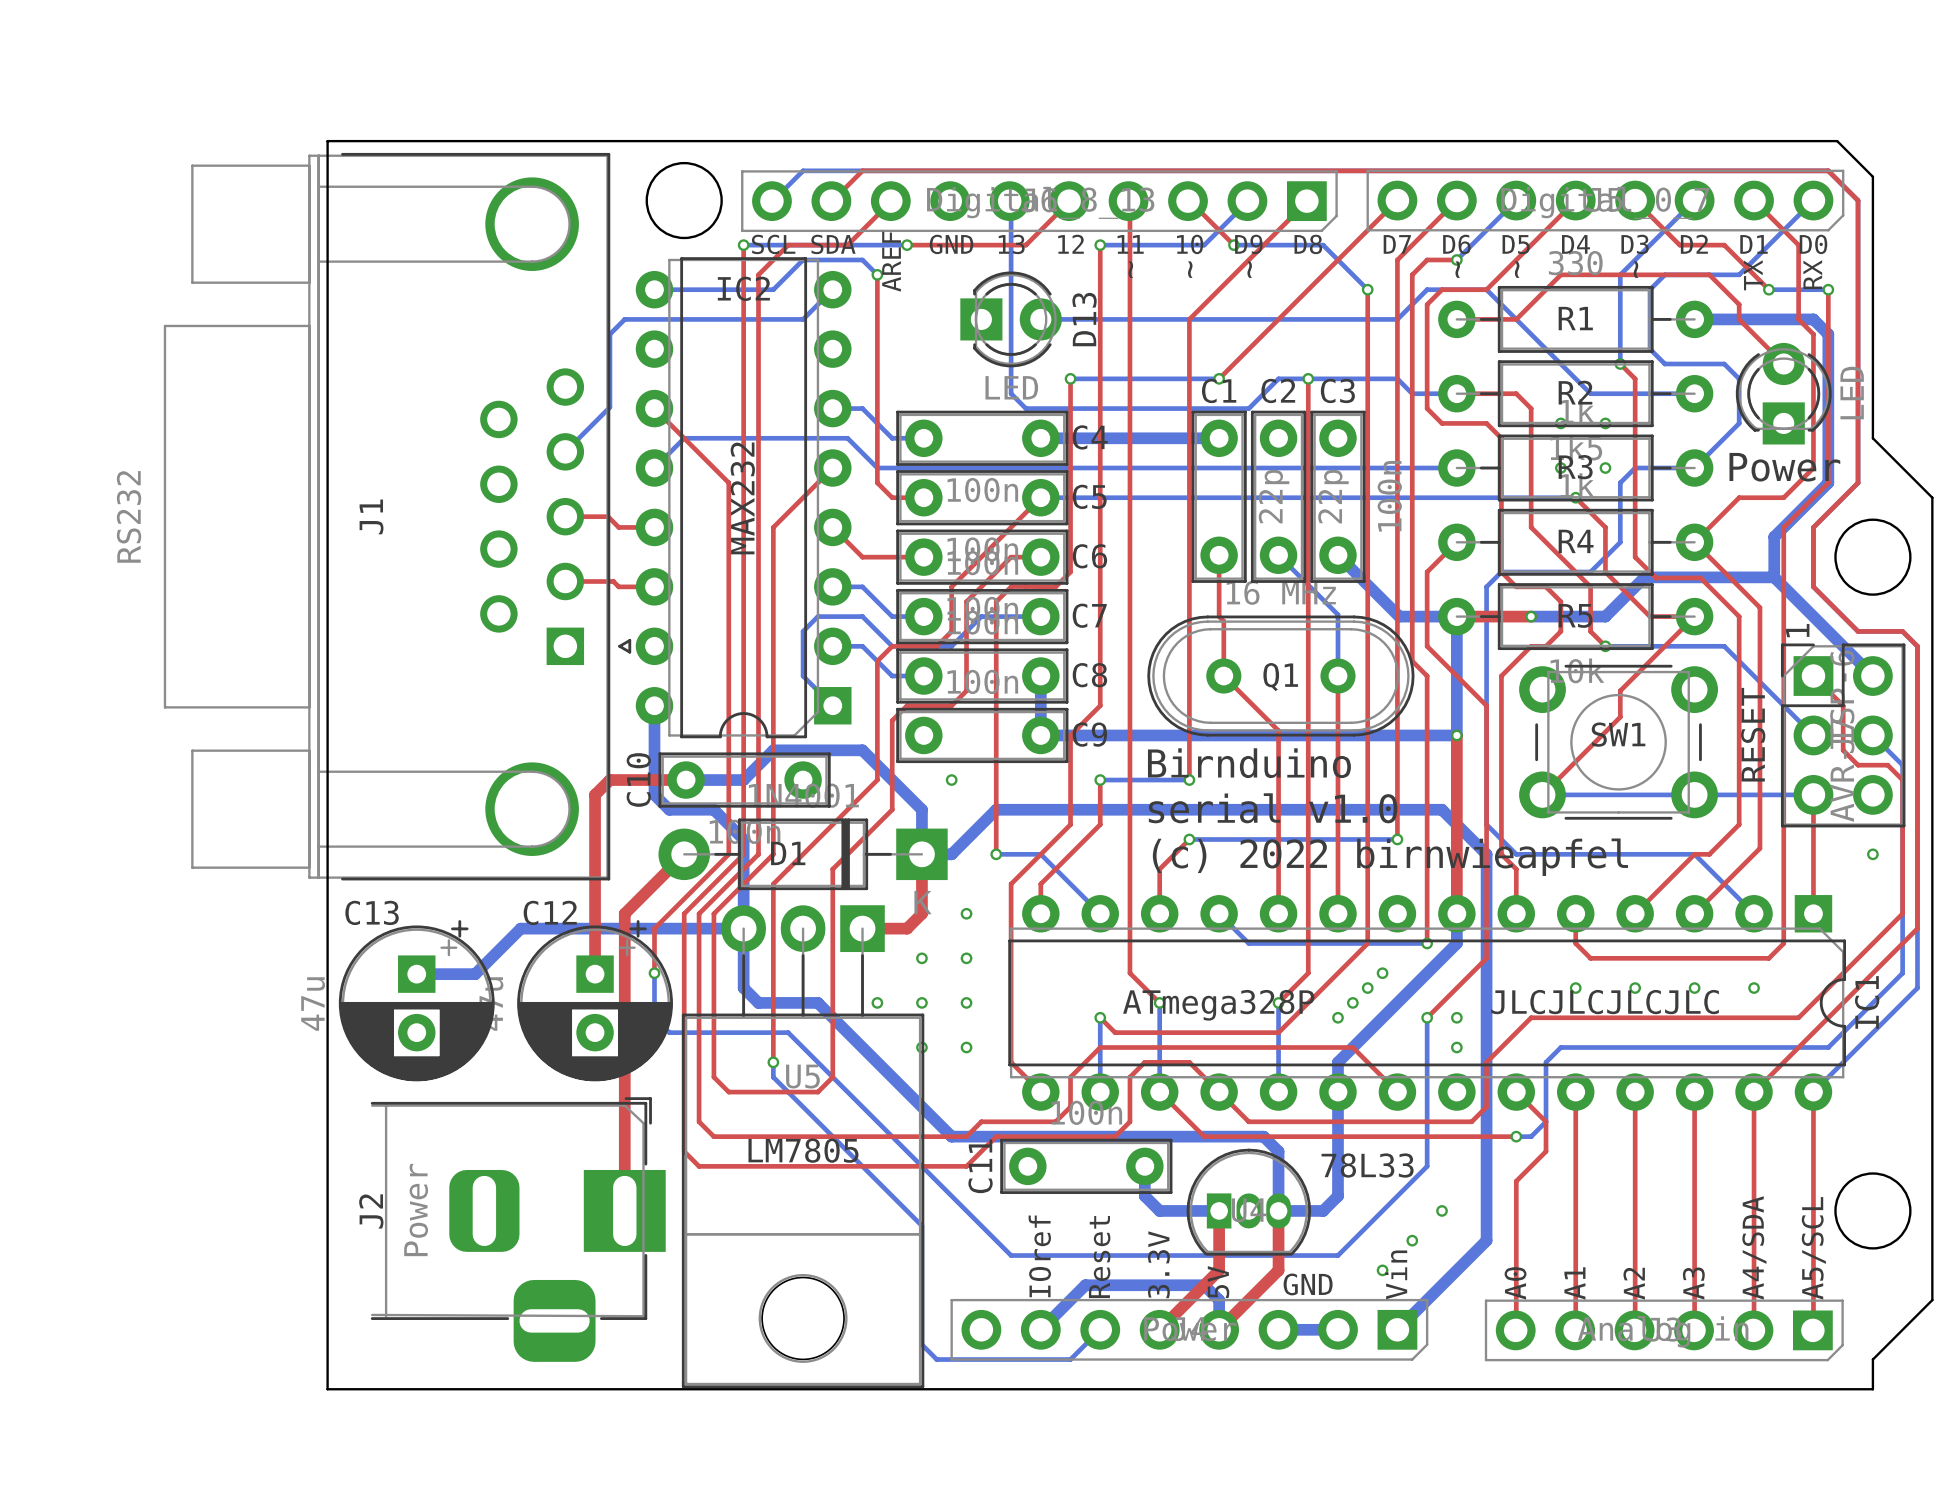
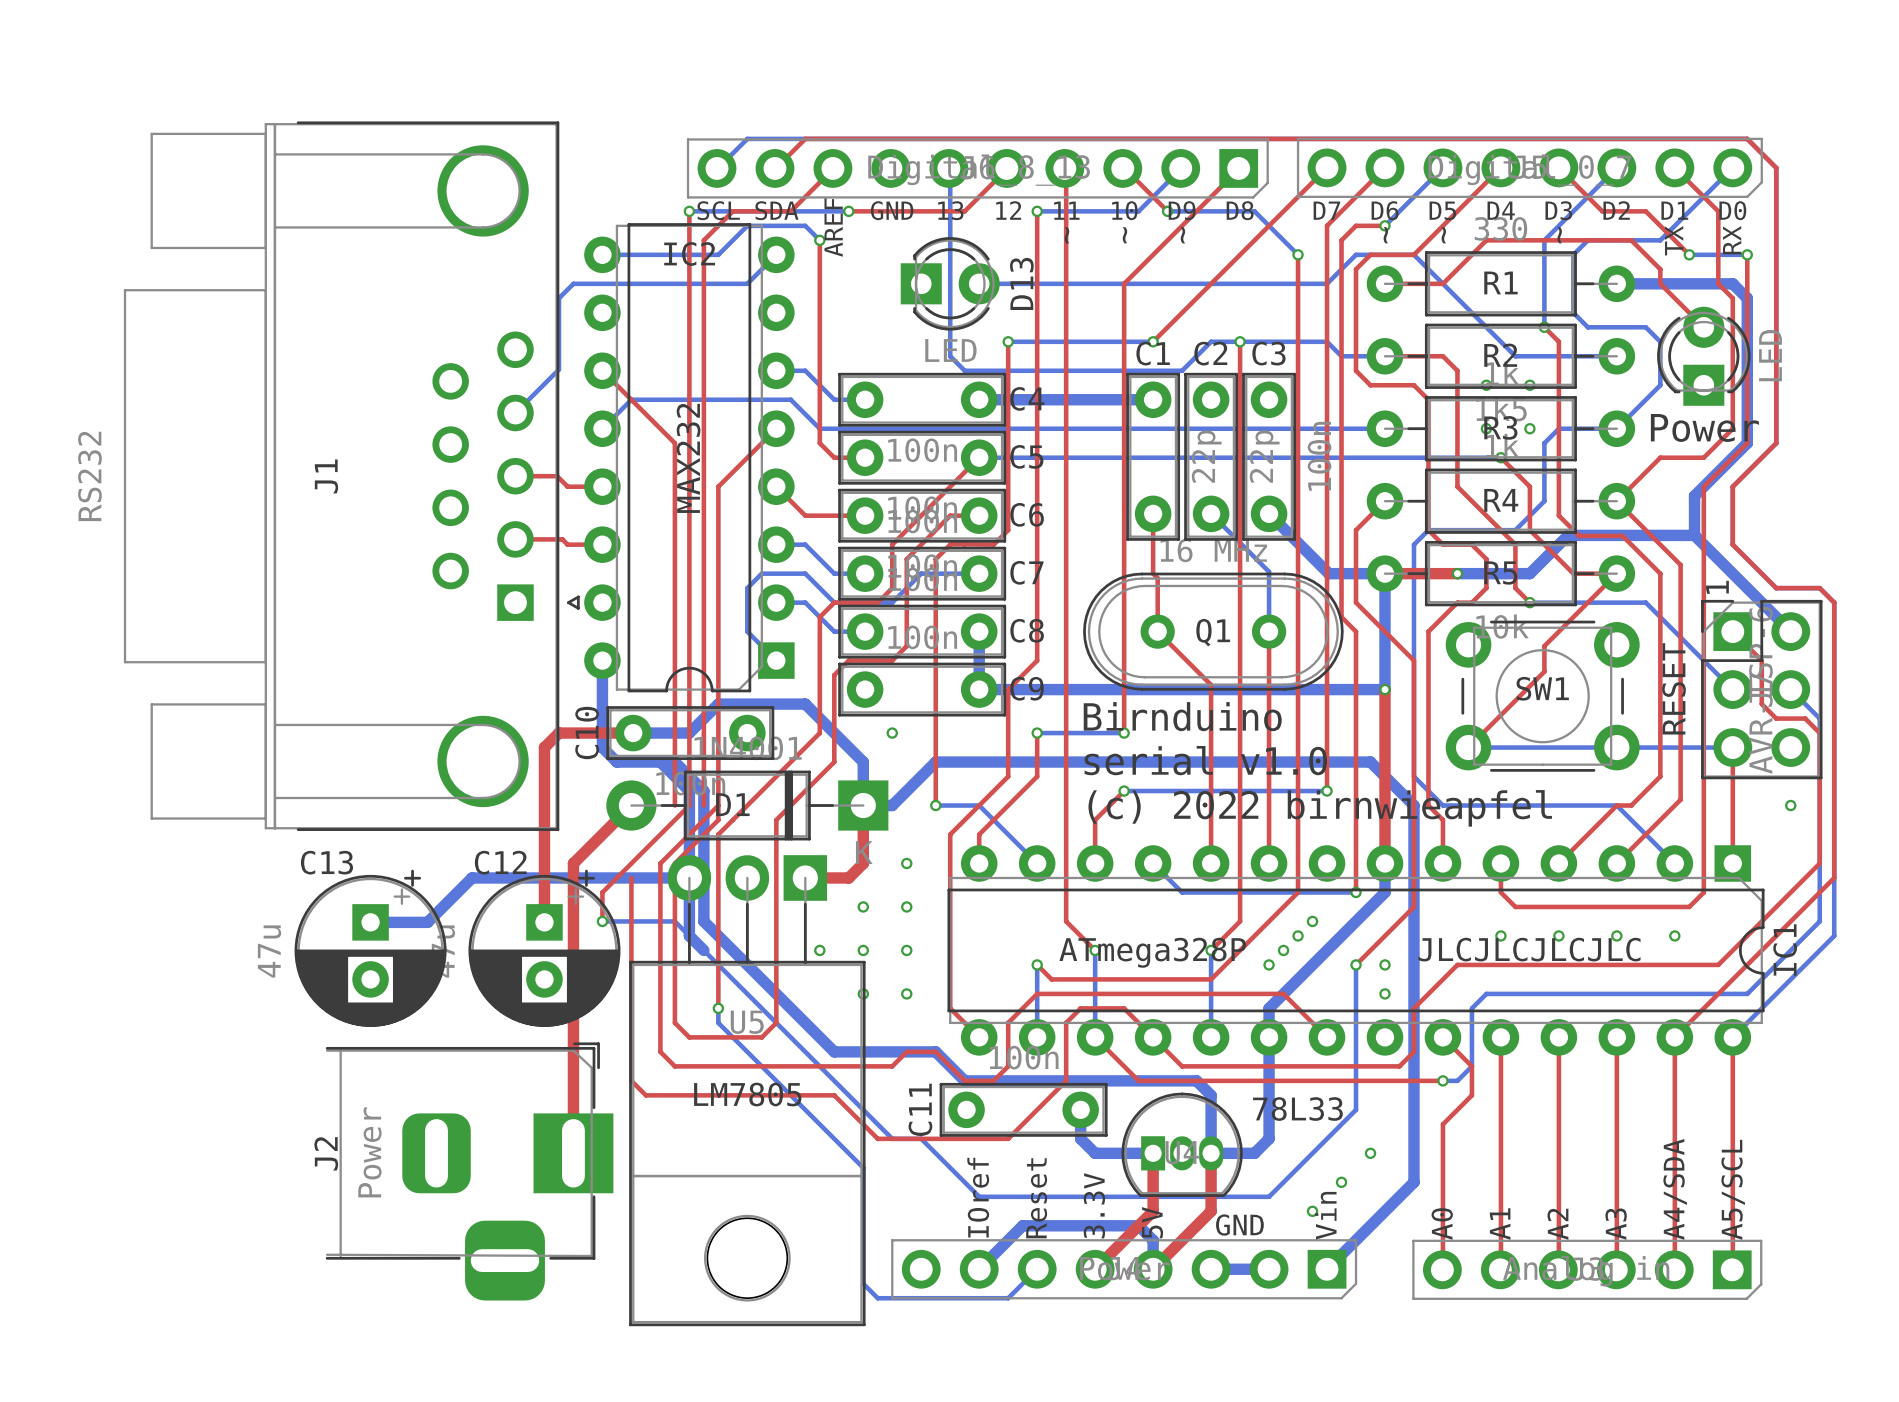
board edge: (327, 141) (327, 1389) (1872, 1389) (1872, 1359) (1932, 1300) (1932, 497) (1872, 438) (1872, 176) (1837, 141) (327, 141) -> none
round board edge: [645, 161, 723, 240] -> none
round board edge: [1834, 518, 1912, 596] -> none
top track: (728, 854) (654, 928) (654, 943) -> none
top track: (758, 854) (699, 913) (699, 1121) (713, 1136) (966, 1136) (981, 1121) (1055, 1121) (1070, 1106) -> none
top track: (684, 913) (684, 928) -> (631, 863) (602, 892)
bottom track: (654, 973) (654, 1017) (669, 1032) (788, 1032) -> (602, 921) (674, 921) (689, 935)
bottom track: (758, 1002) (817, 1002) (951, 1136) (1025, 1136) -> (660, 762) (674, 762) (703, 791) (703, 921) (834, 1051) (935, 1051) (964, 1080)
bottom track: none -> (703, 950) (732, 979)
top track: (713, 1077) (728, 1092) (743, 1092) -> (718, 805) (718, 820) (674, 863) (674, 1022) (689, 1037)
top track: (1129, 1121) (1115, 1136) (1055, 1136) -> (1008, 1051) (1008, 1066) (993, 1080)
top track: none -> (1066, 1066) (1066, 1080) (1008, 1138) (877, 1138) (834, 1095) (645, 1095) (631, 1080)
top track: (684, 1136) (684, 1151) (699, 1166) (966, 1166) (996, 1136) (1025, 1136) -> (660, 1022) (660, 1051) (674, 1066) (892, 1066) (906, 1051) (935, 1051) (964, 1080)
round board edge: [1834, 1172, 1912, 1250] -> none
bottom track: (951, 1196) (1011, 1255) (1040, 1255) -> (892, 1138) (921, 1138) (979, 1196)

